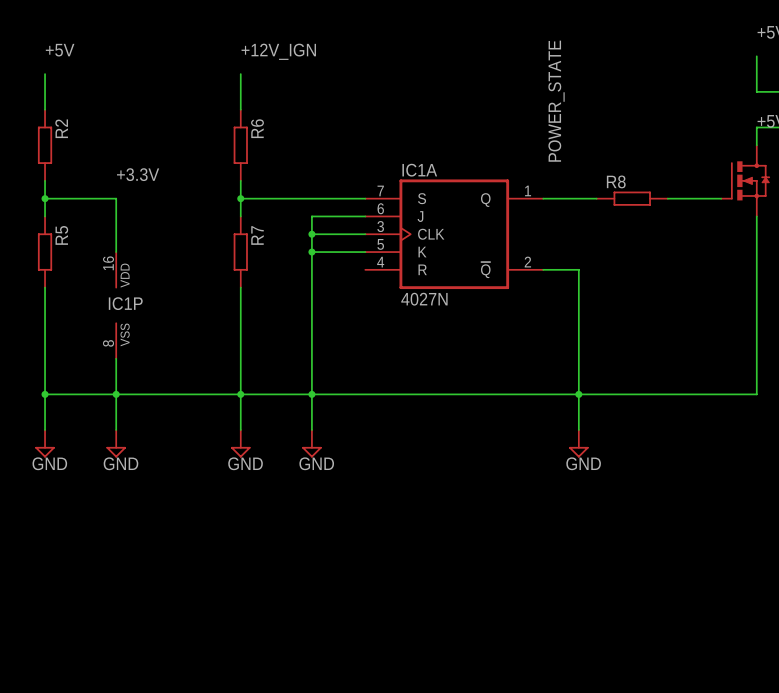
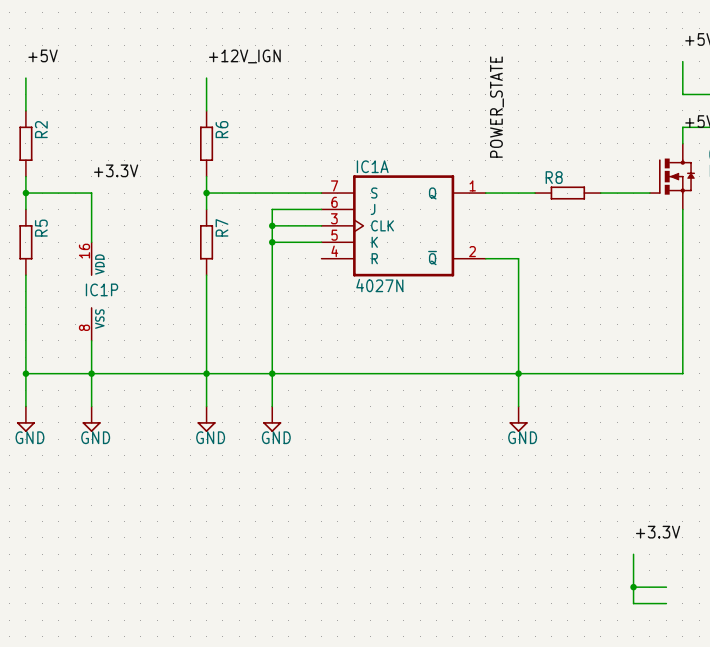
label: none -> +3.3V (658, 532)
wire: none -> (633, 554) (633, 603) (666, 603)
wire: none -> (633, 587) (666, 587)
junction: none -> (633, 587)

